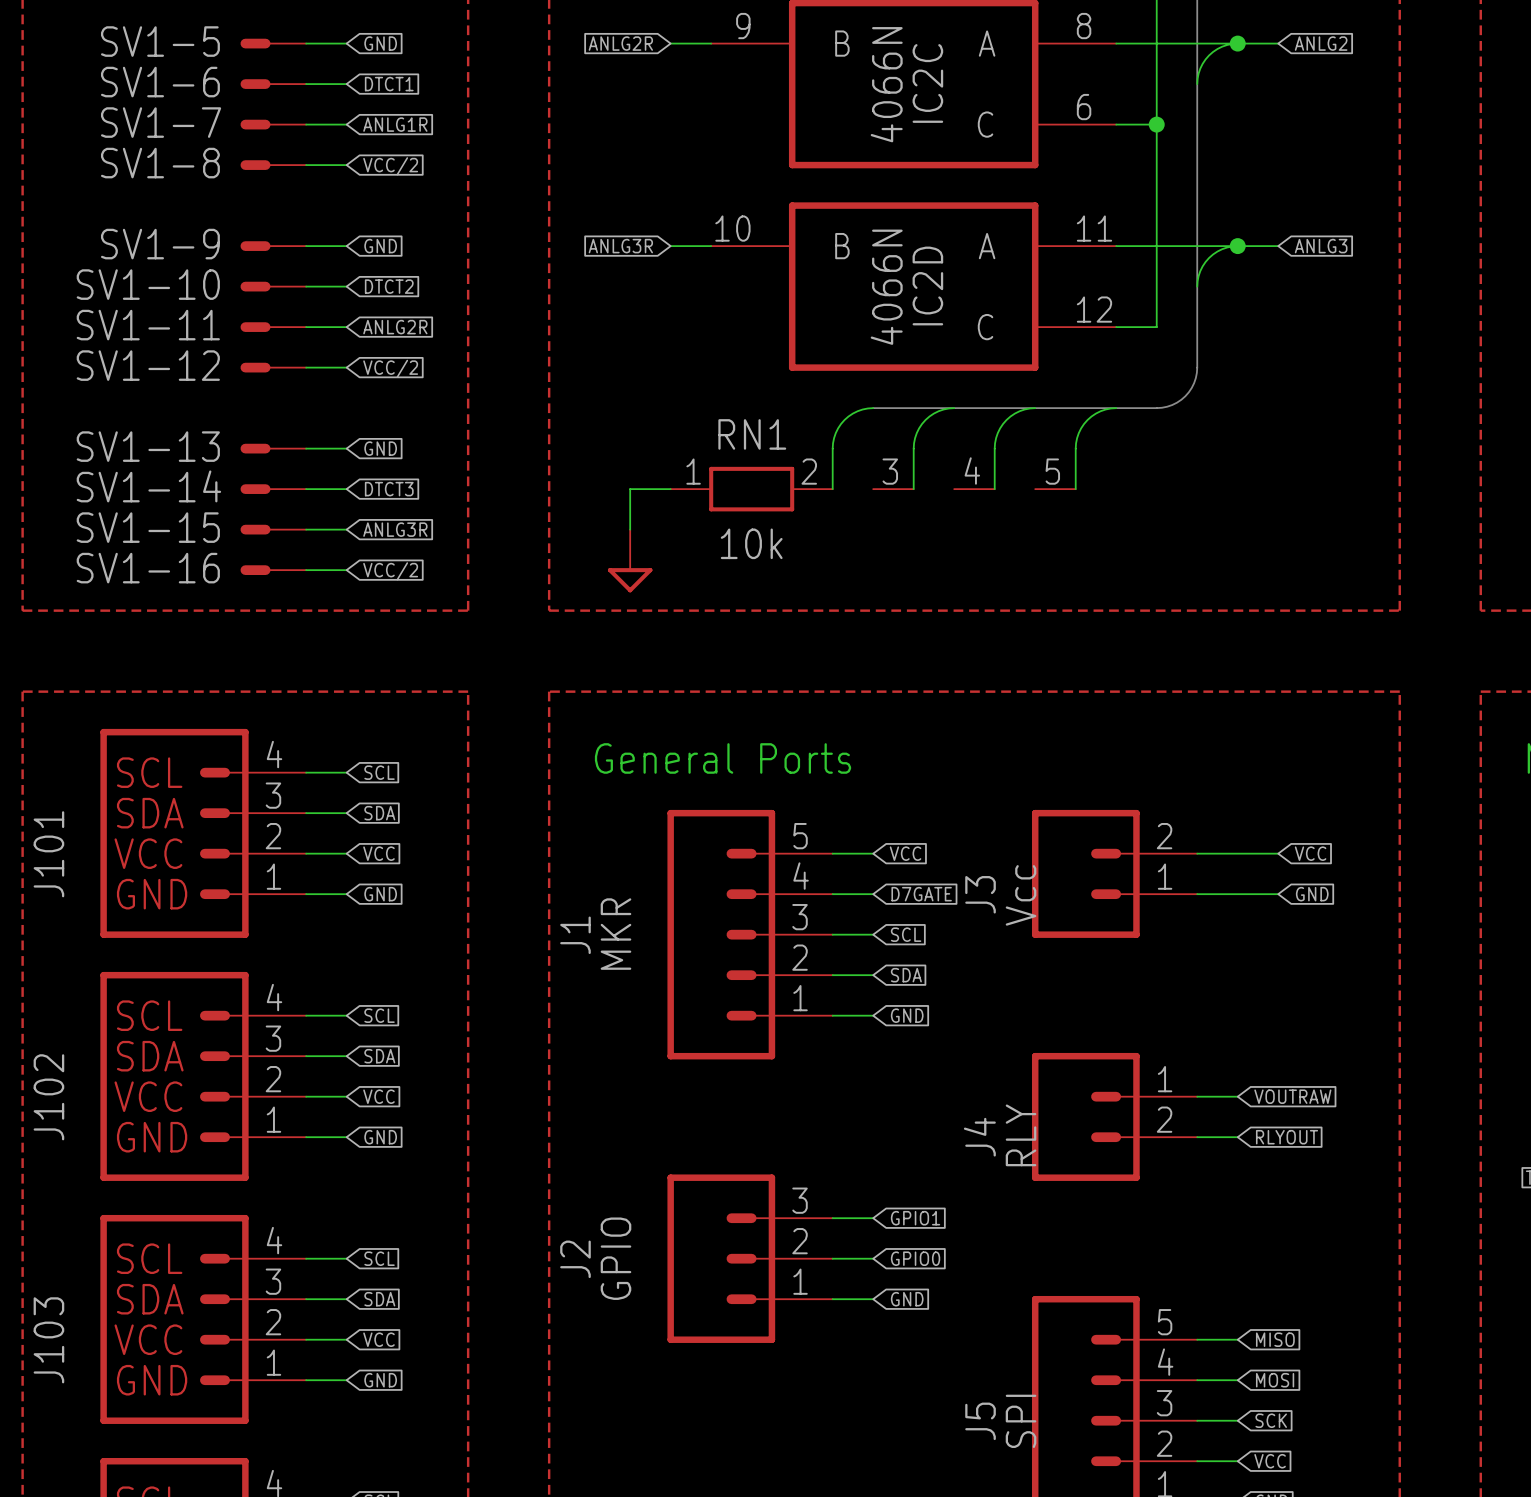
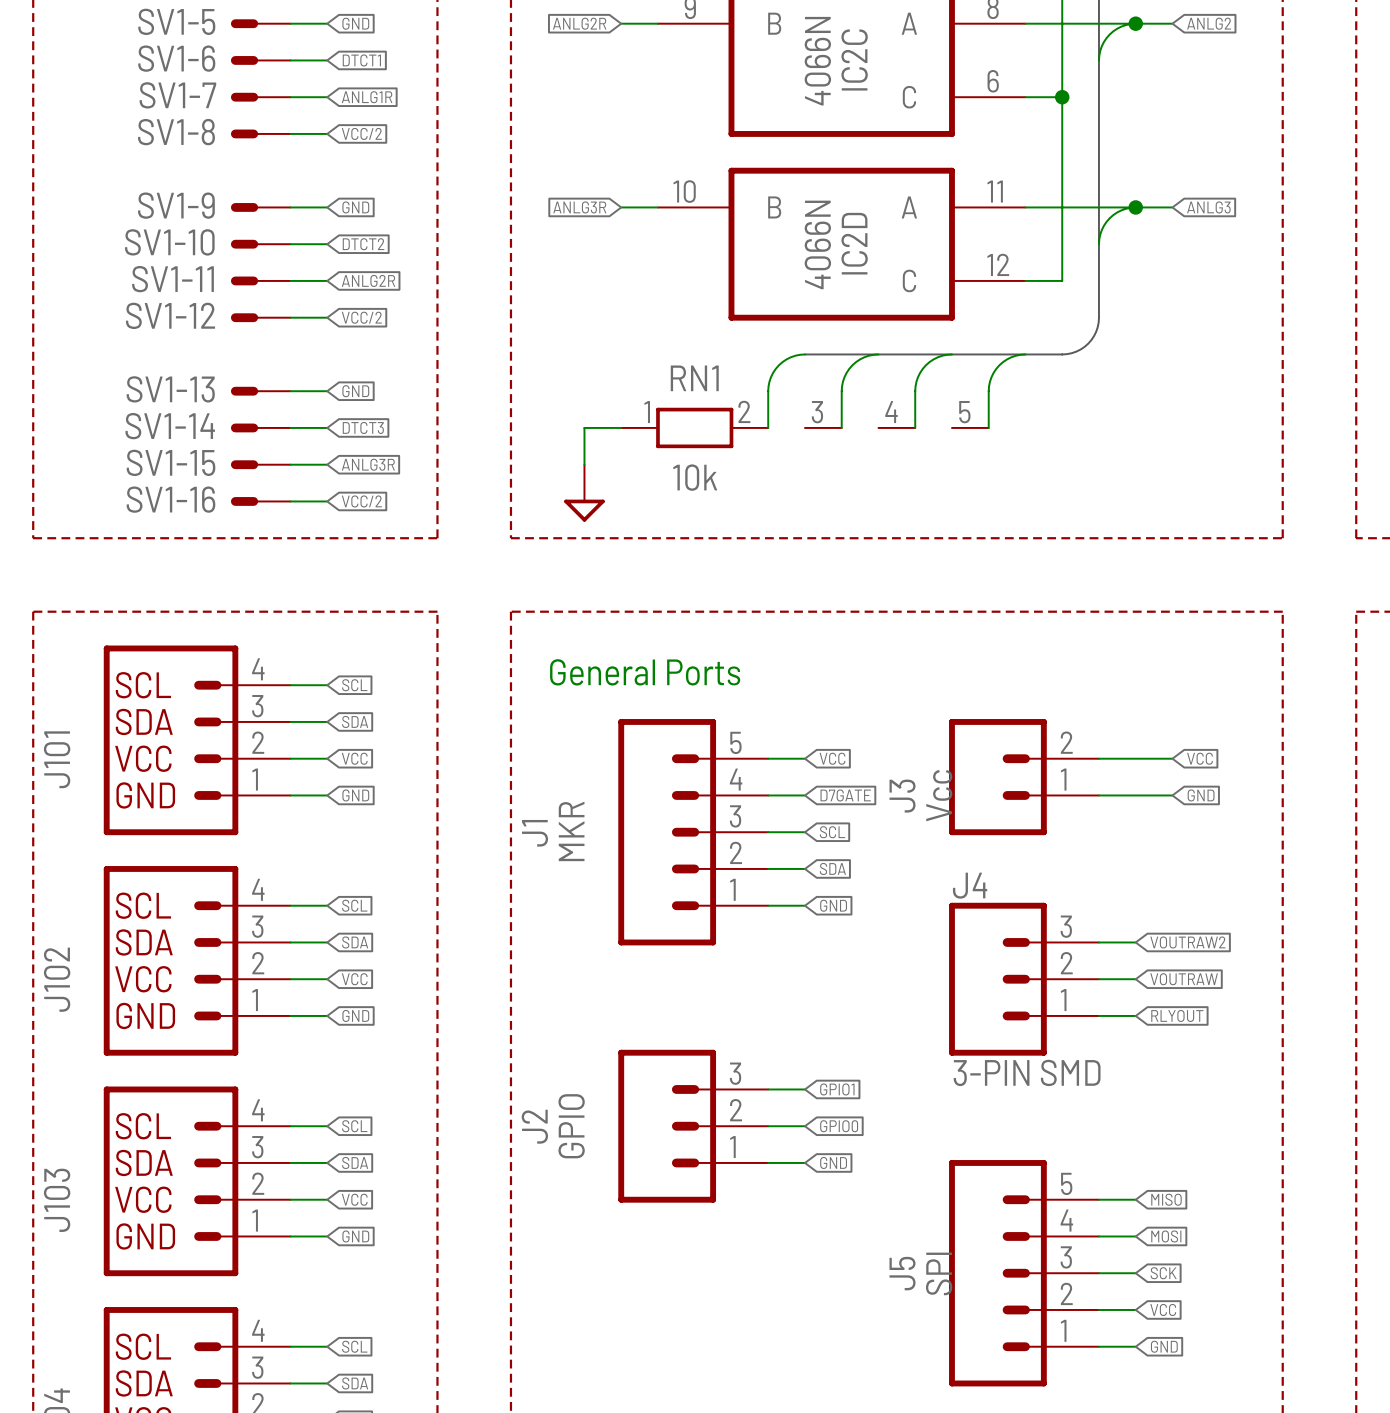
J4 symbol: [1031, 1052, 1198, 1181] -> [949, 902, 1099, 1056]
wire: none -> (1098, 942) (1135, 942)
global label: none -> VOUTRAW2 (1187, 942)
J4 value: RLY (1021, 1135) -> 3-PIN SMD (1027, 1072)
J4 name position: J4 (979, 1137) -> J4 (970, 885)

